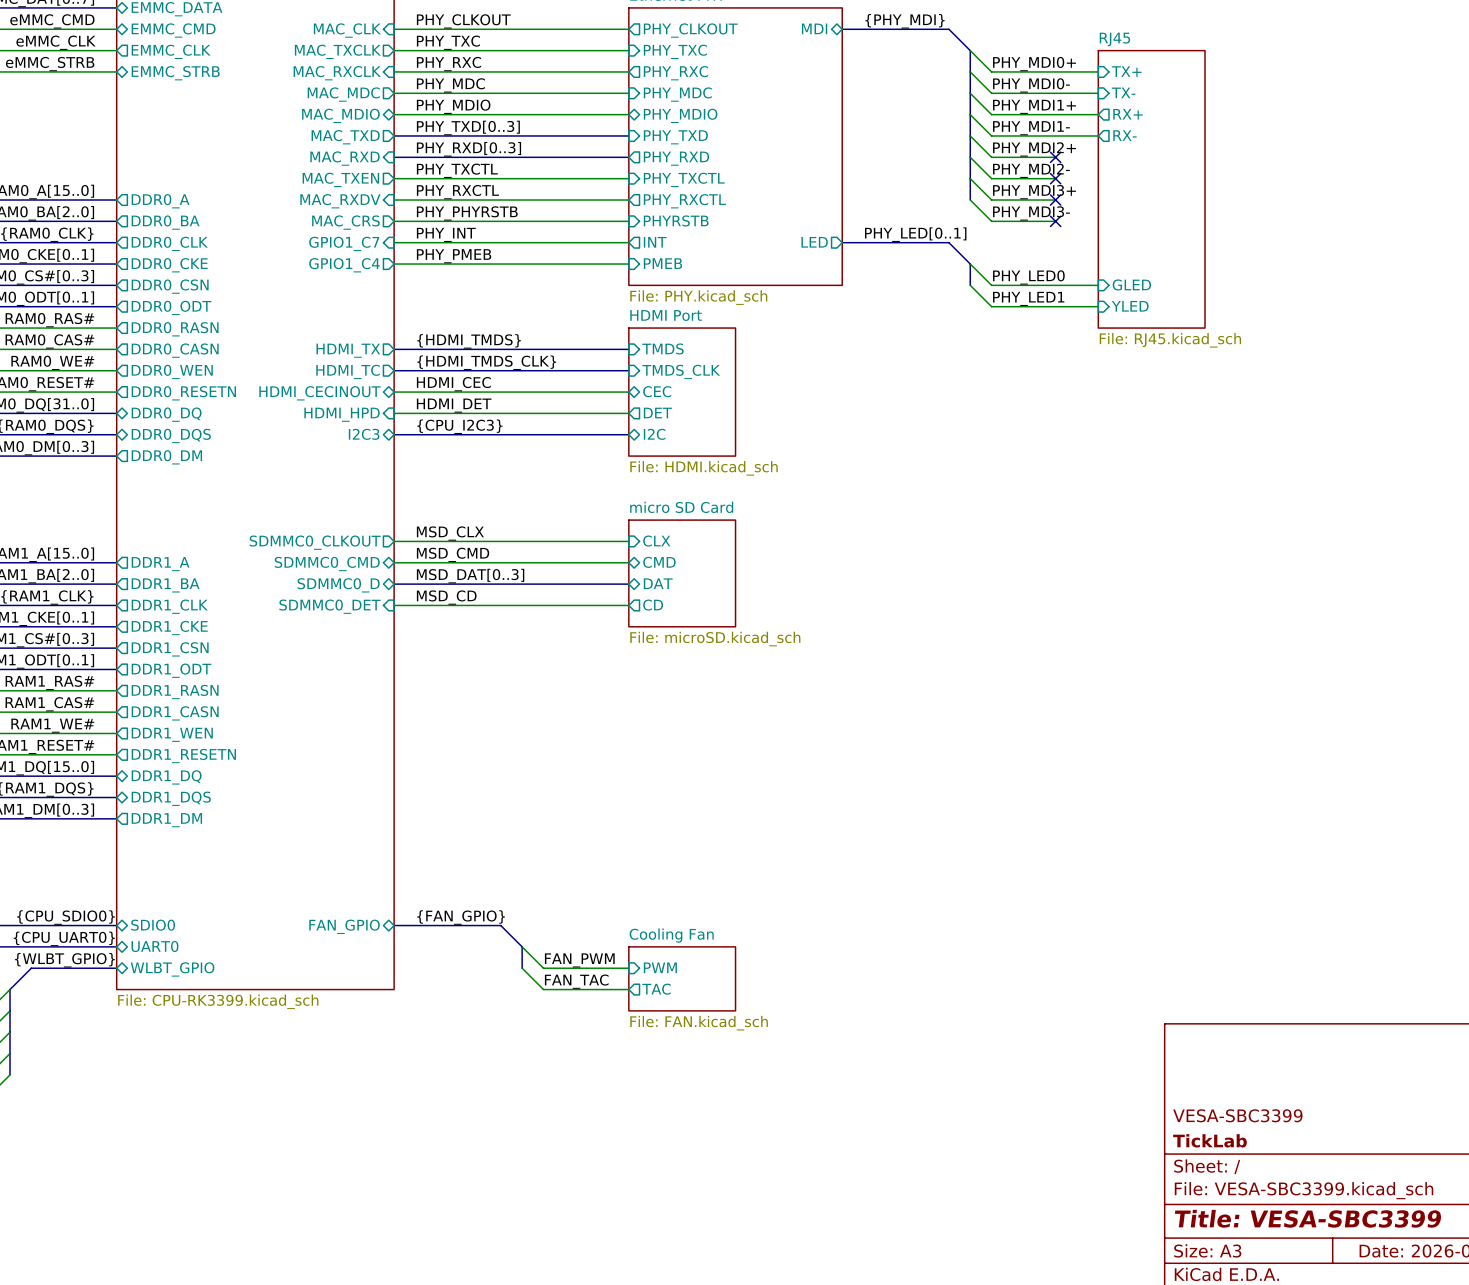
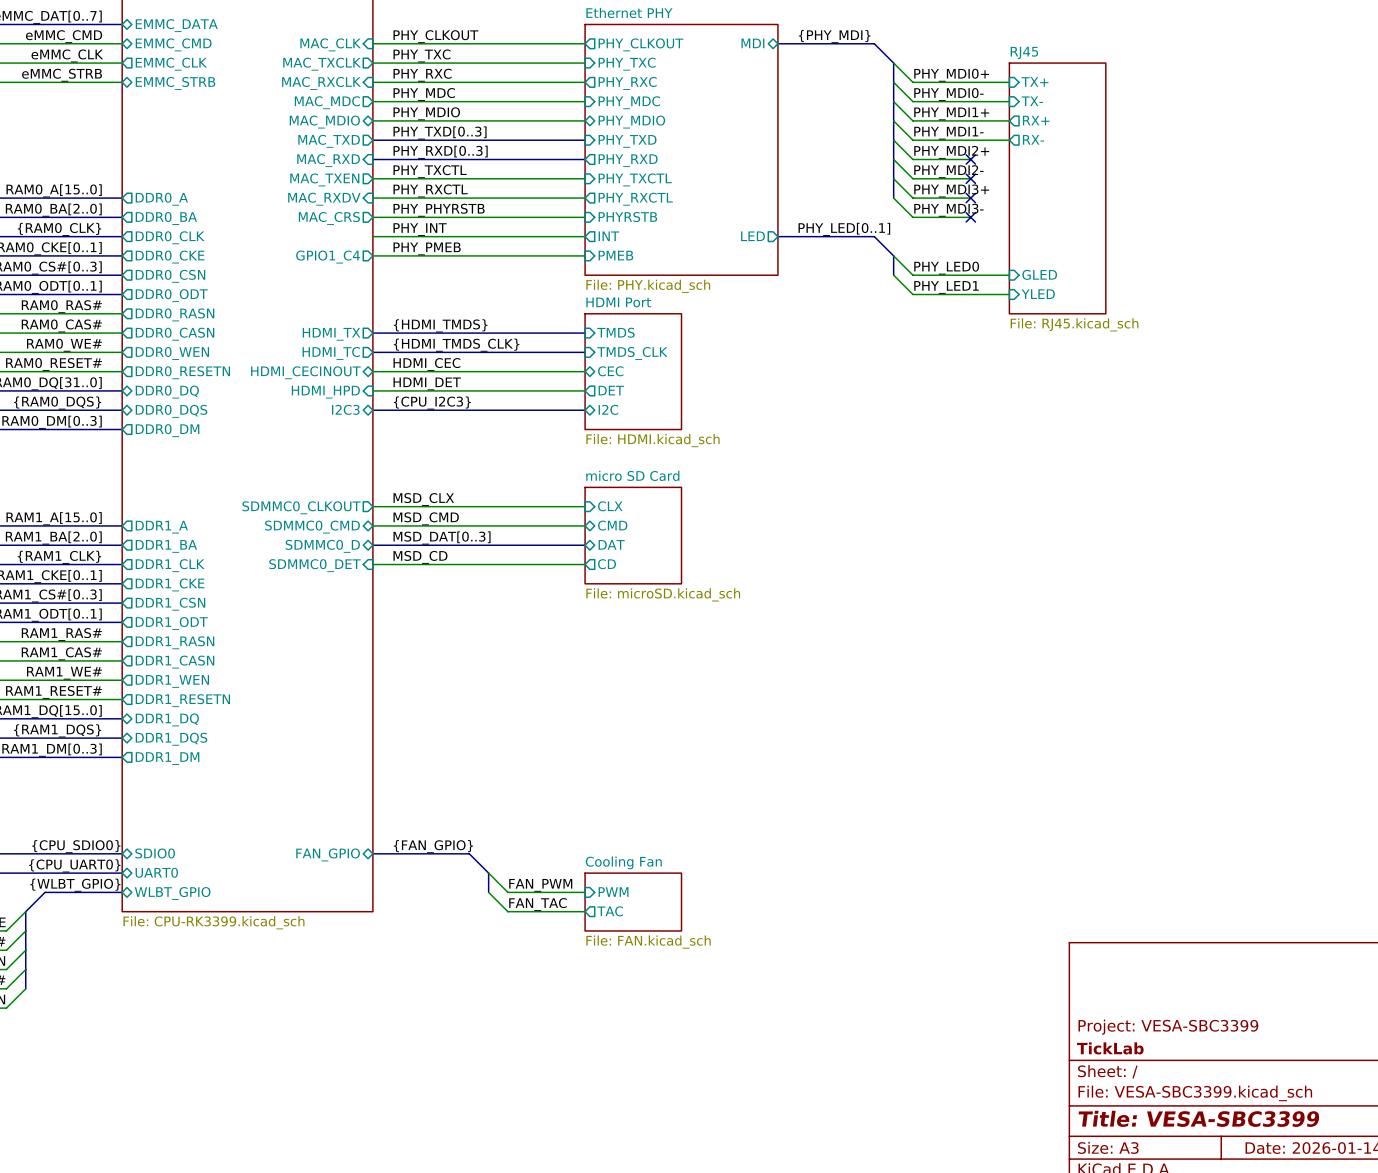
sheet pin: GPIO1_C7 (344, 243) -> none
title block: VESA-SBC3399 (1237, 1115) -> Project: VESA-SBC3399 (1168, 1027)

